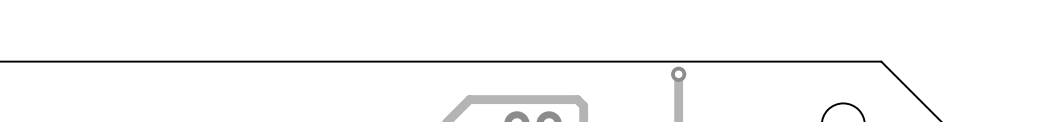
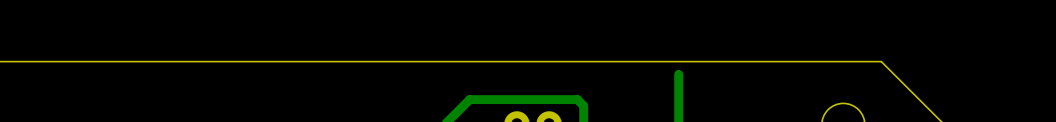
via: (678, 74) -> none

